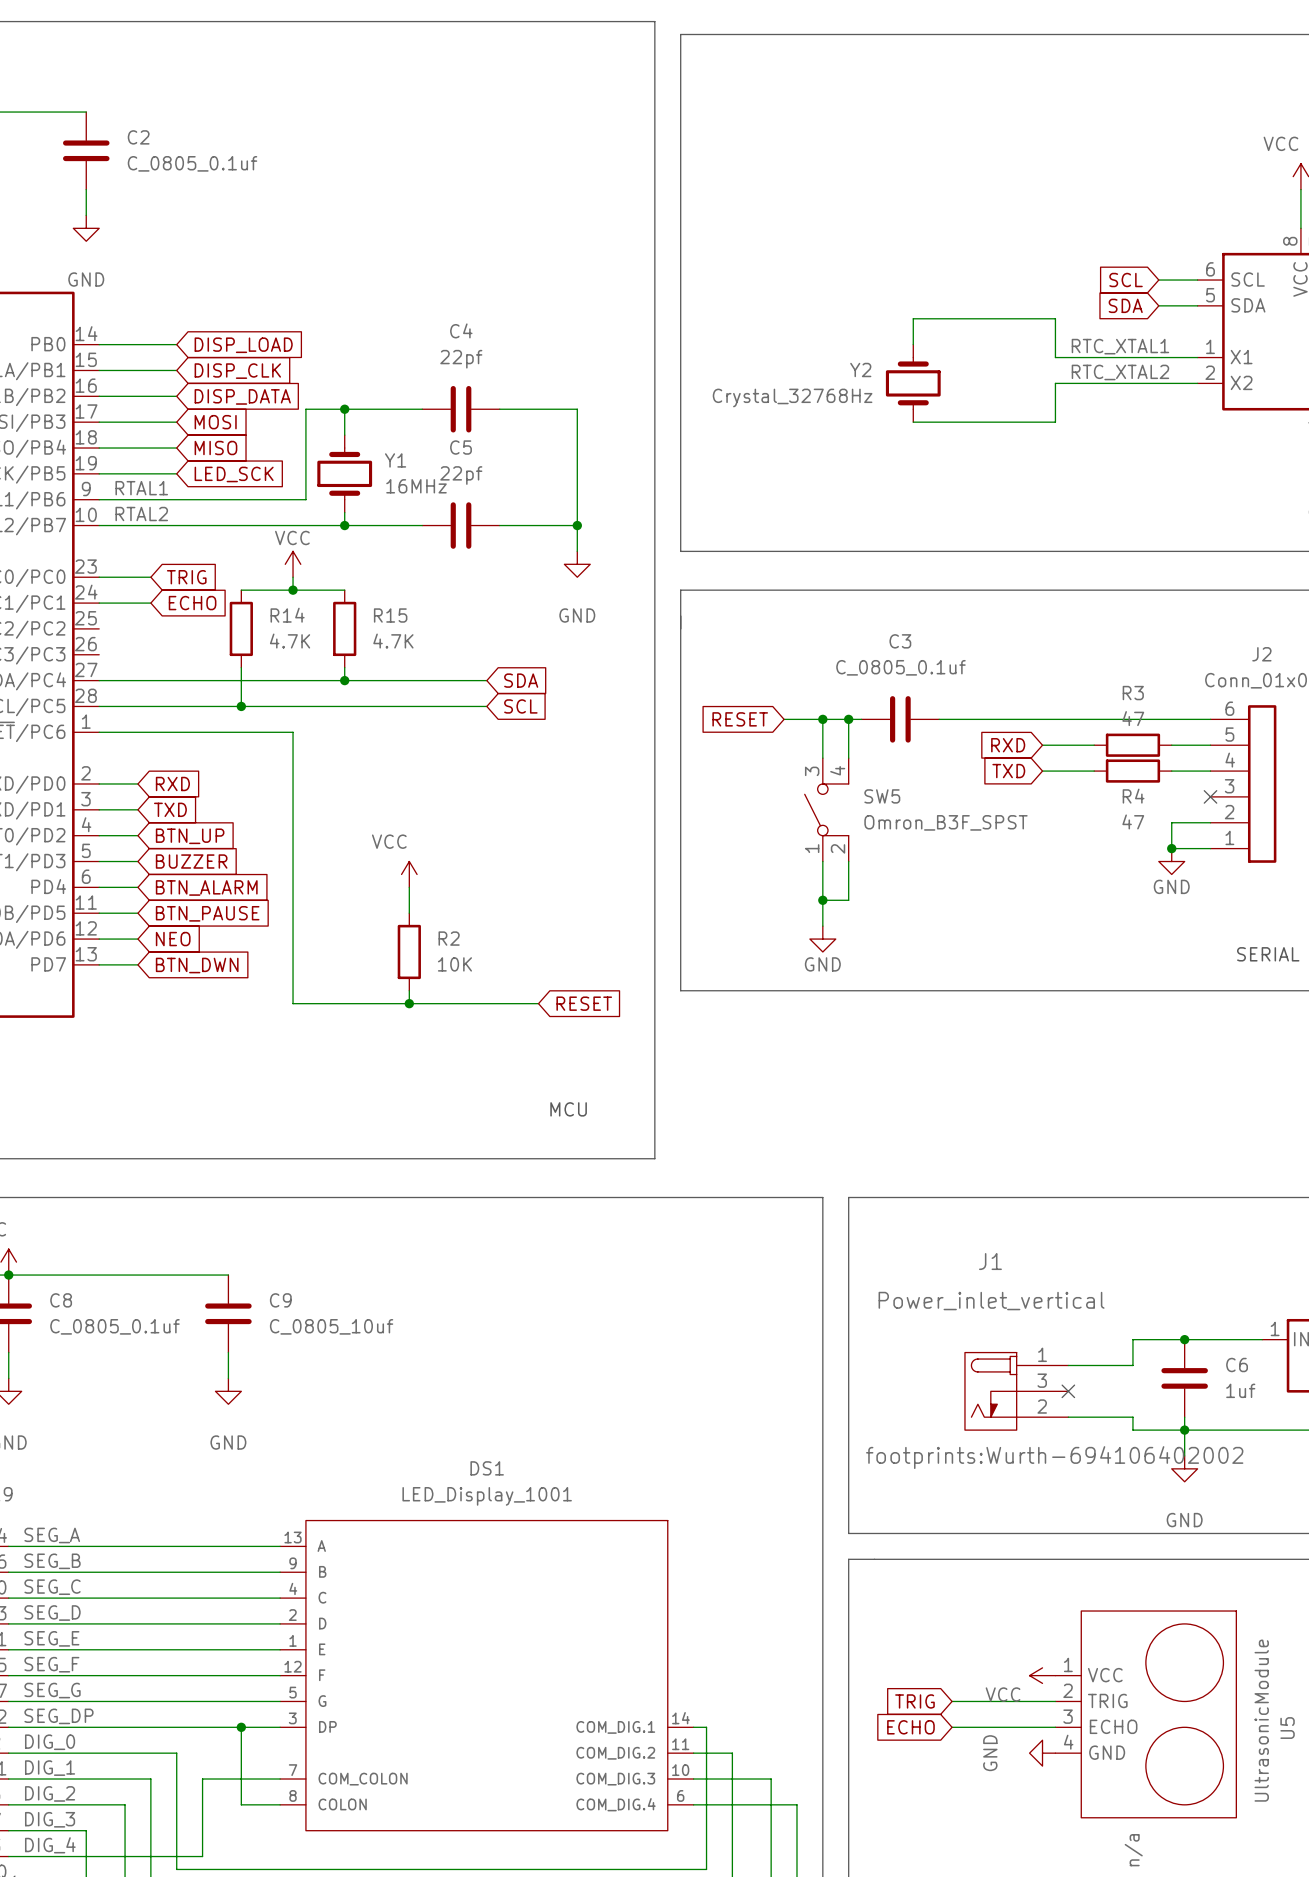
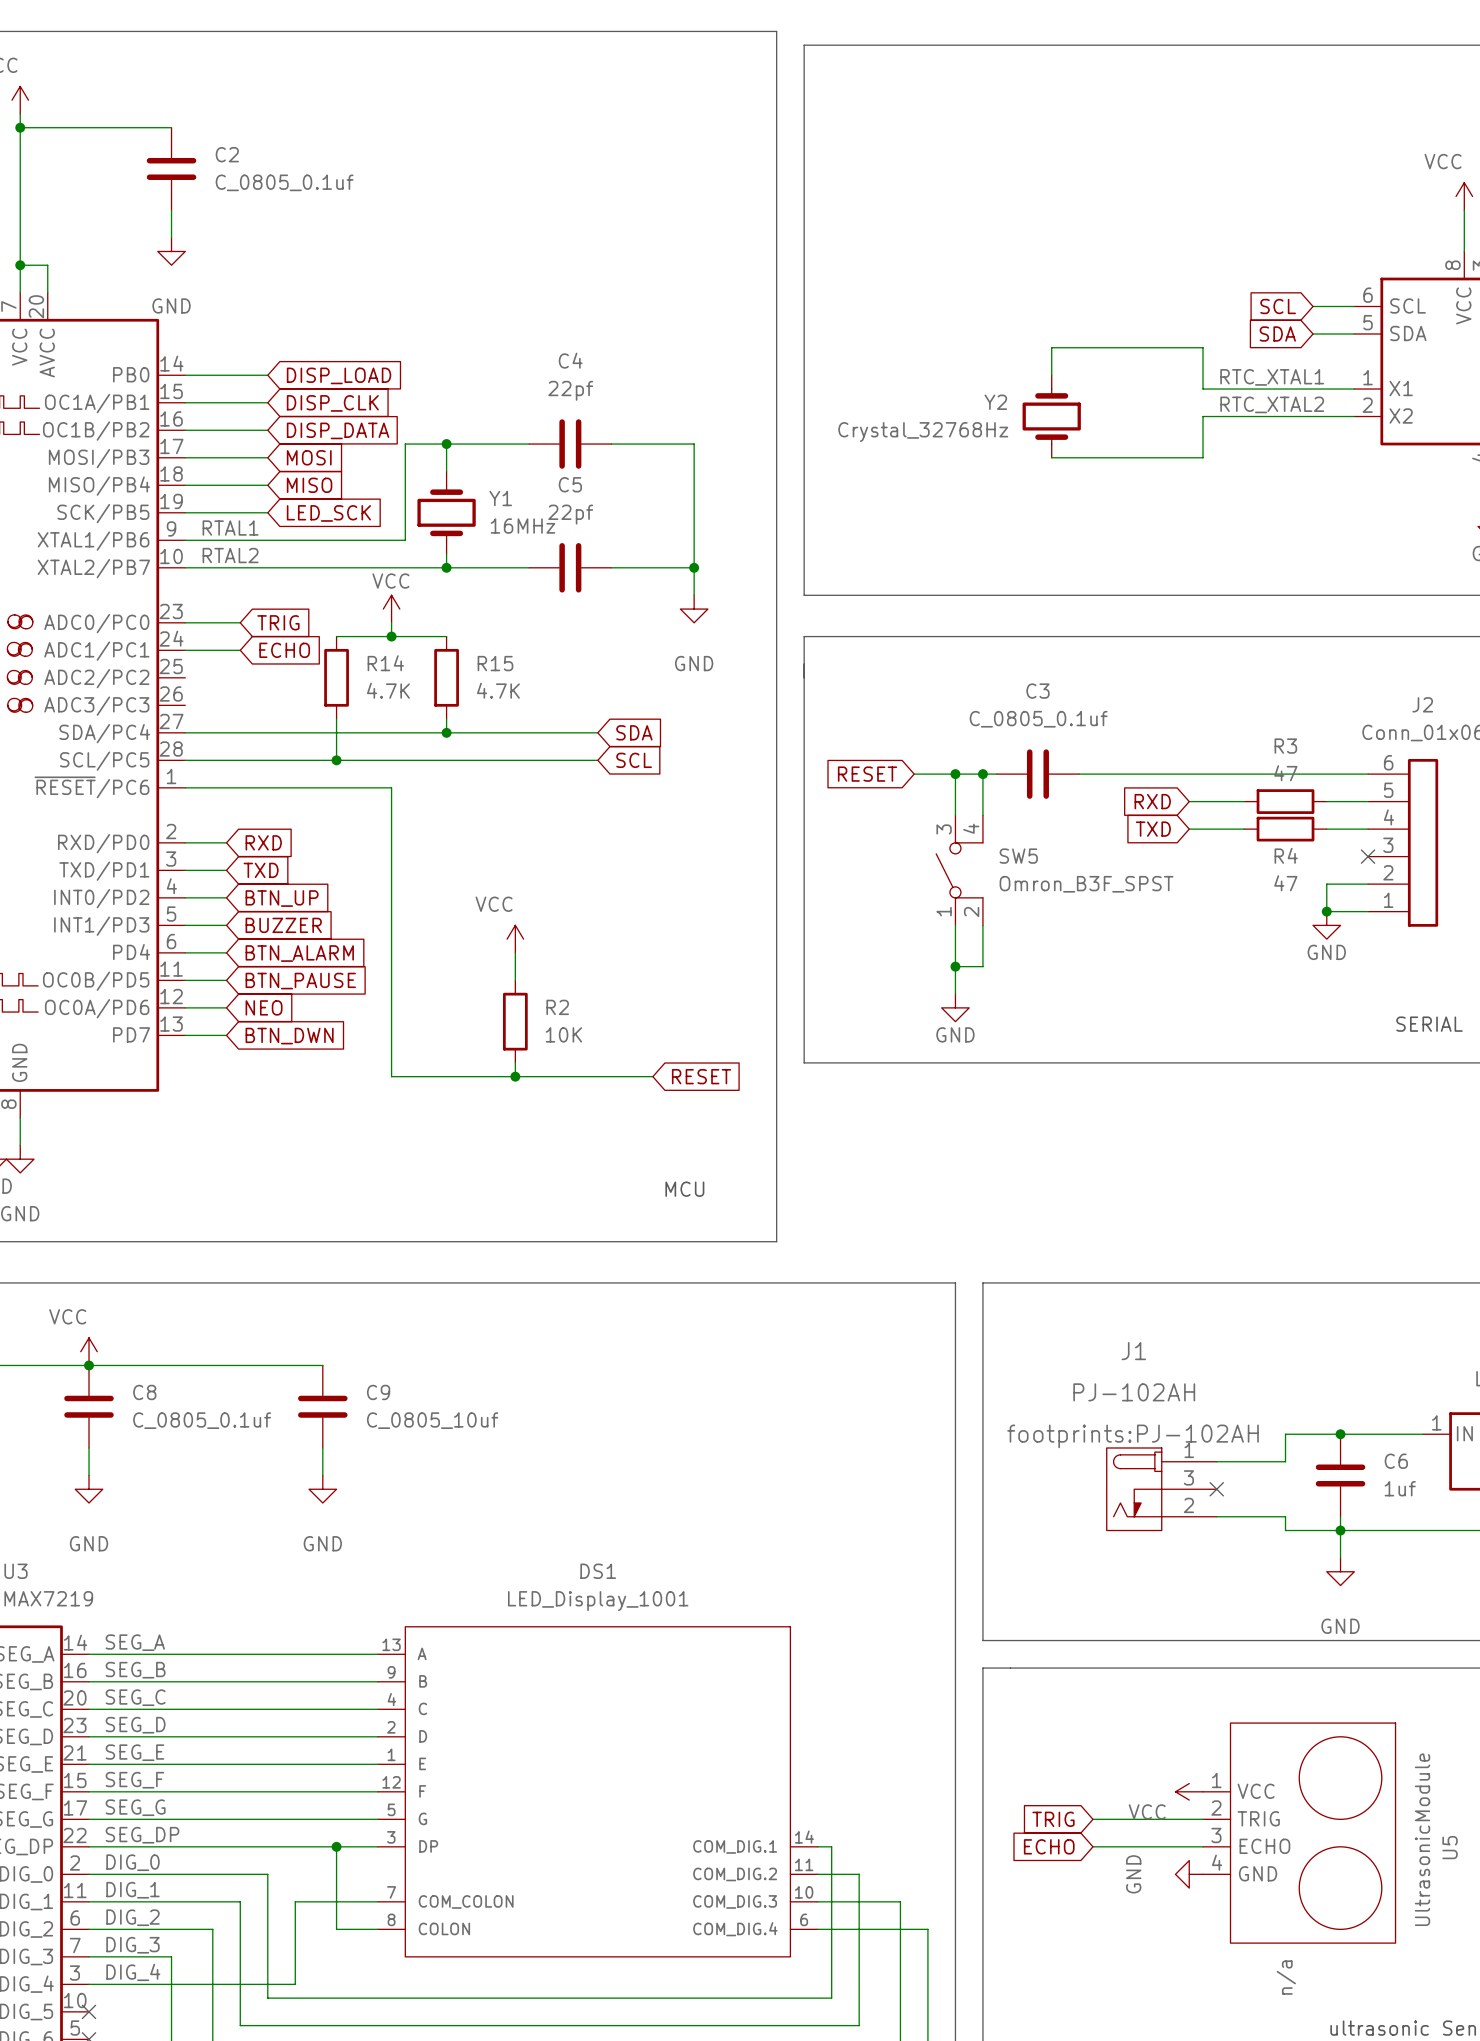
J1 value: Power_inlet_vertical (991, 1301) -> PJ-102AH (1134, 1392)
J1 text: footprints:Wurth-694106402002 (1054, 1457) -> footprints:PJ-102AH (1133, 1436)

